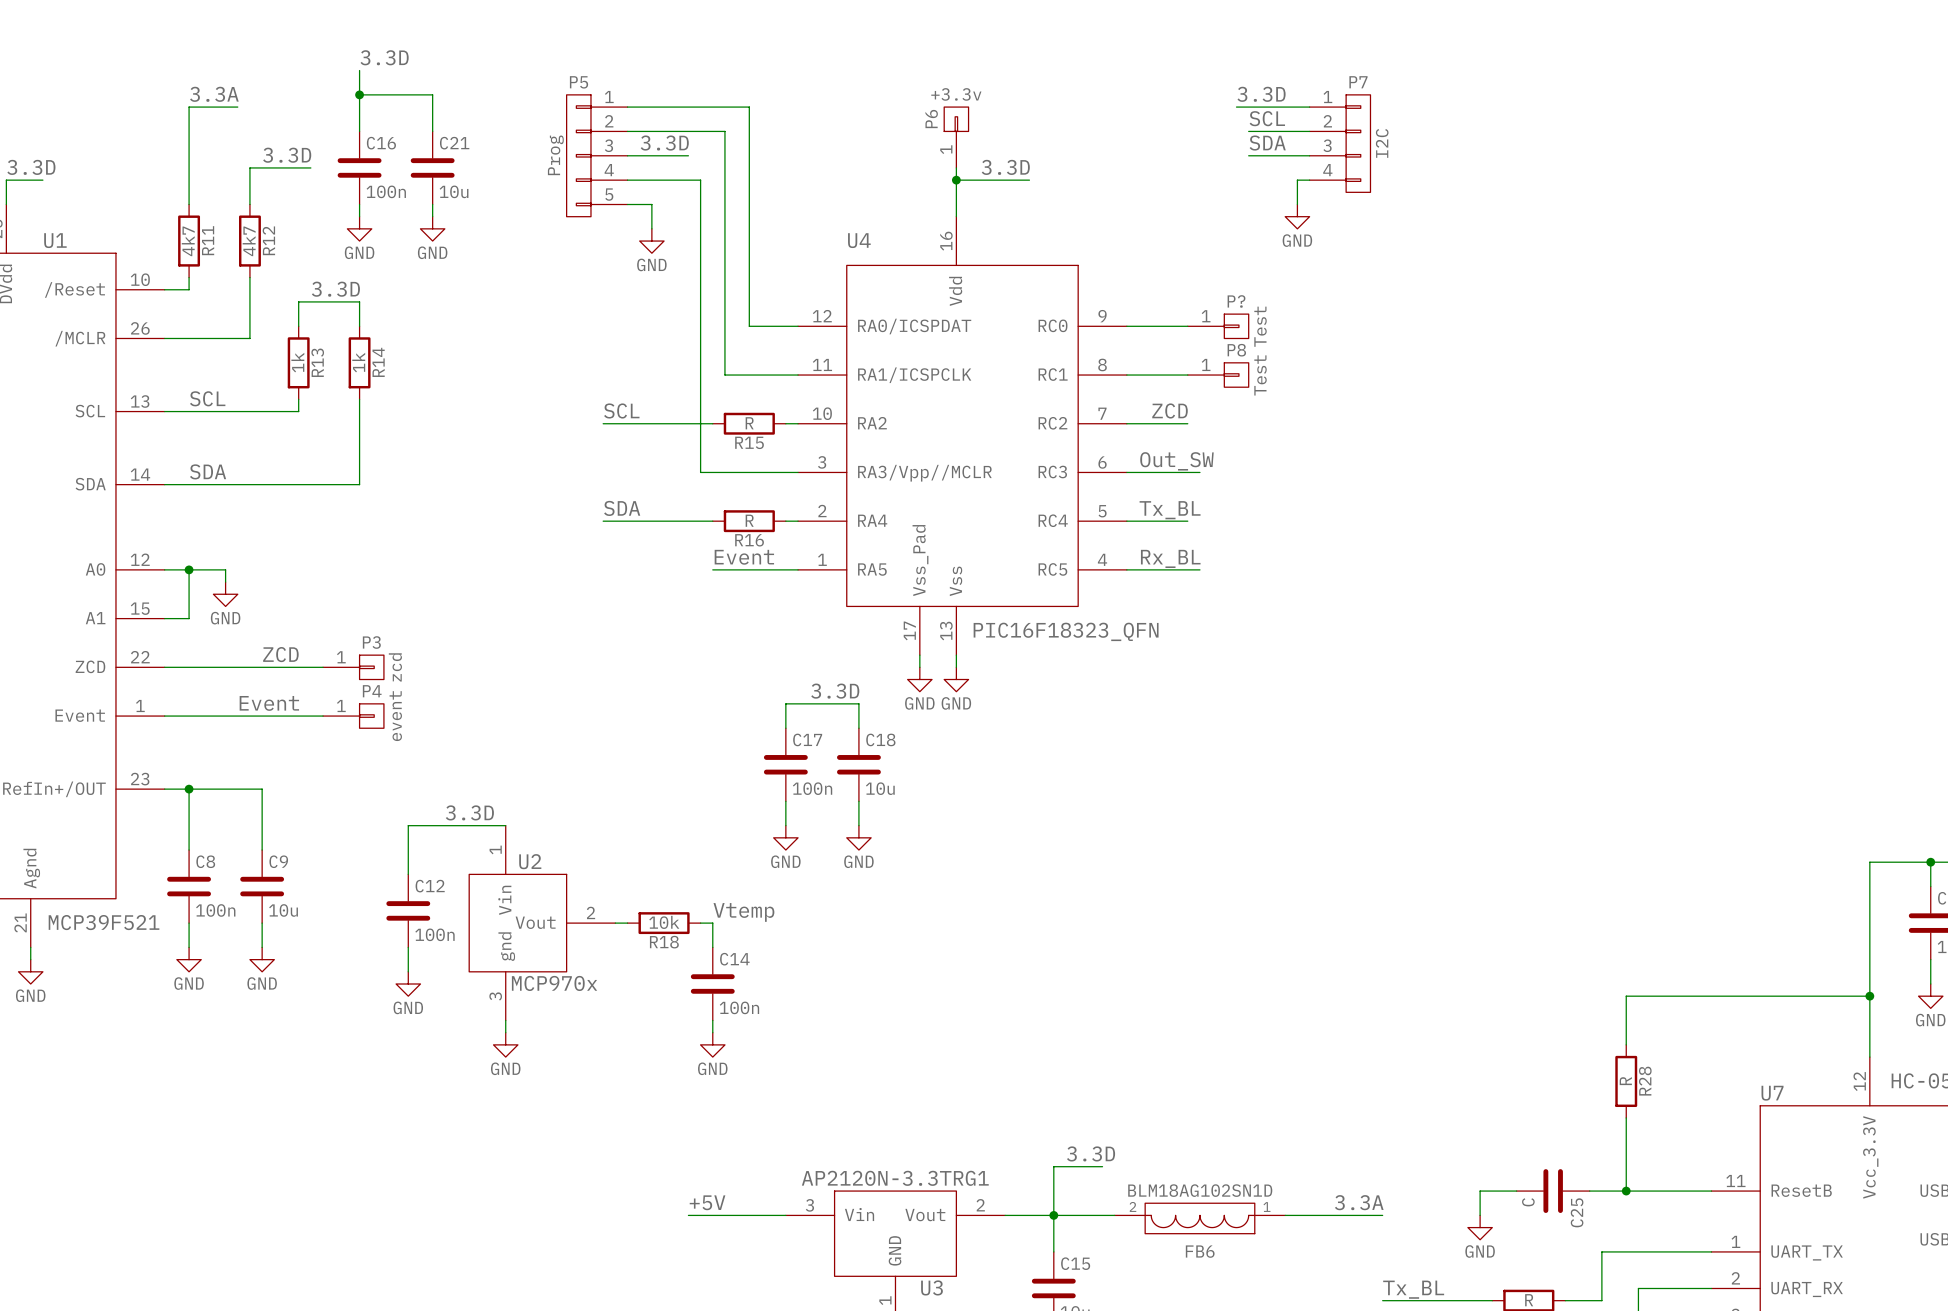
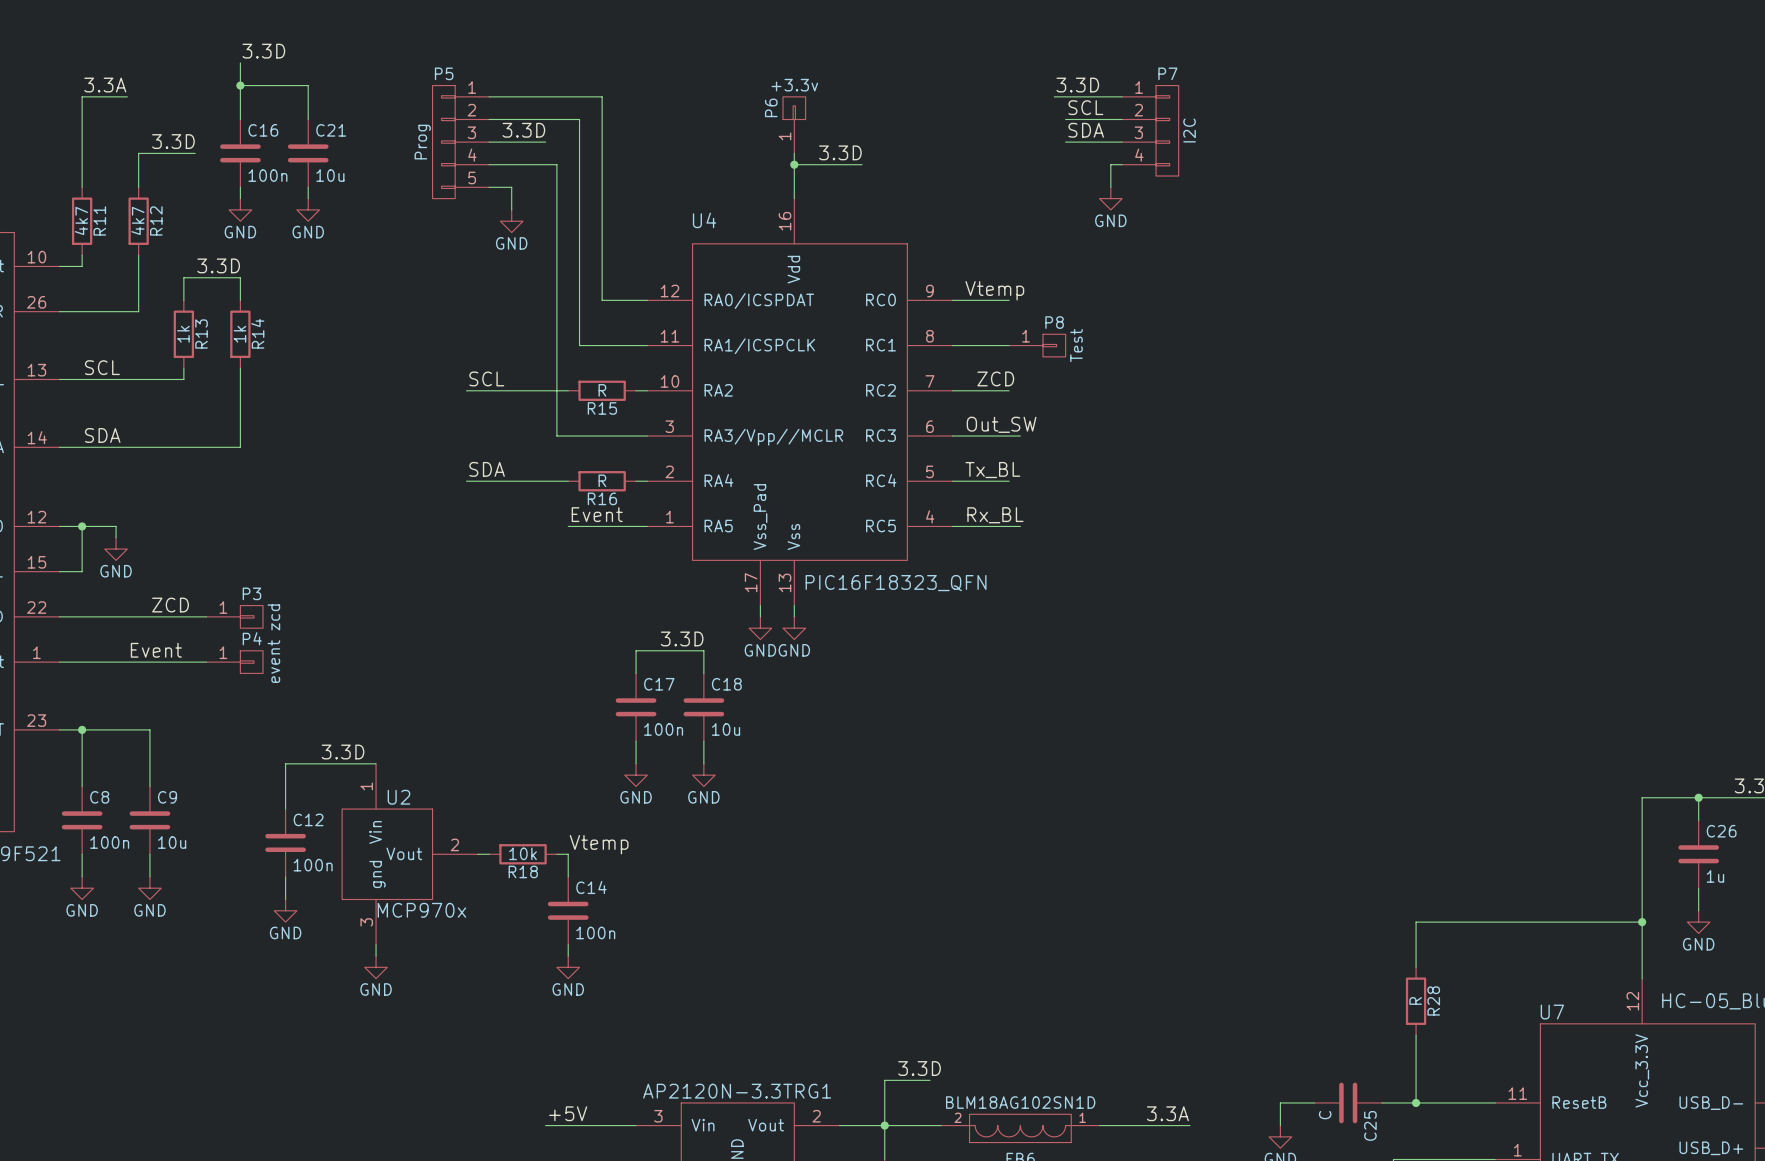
label: none -> Vtemp (994, 290)
P?: Test (1218, 326) -> none

